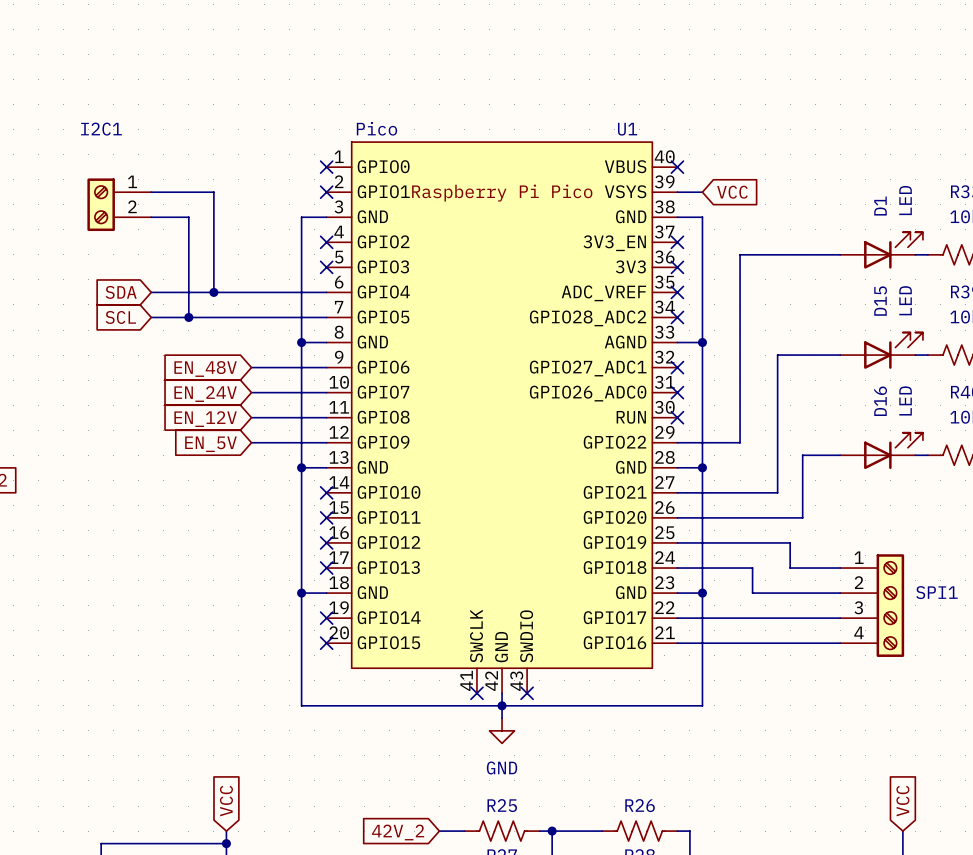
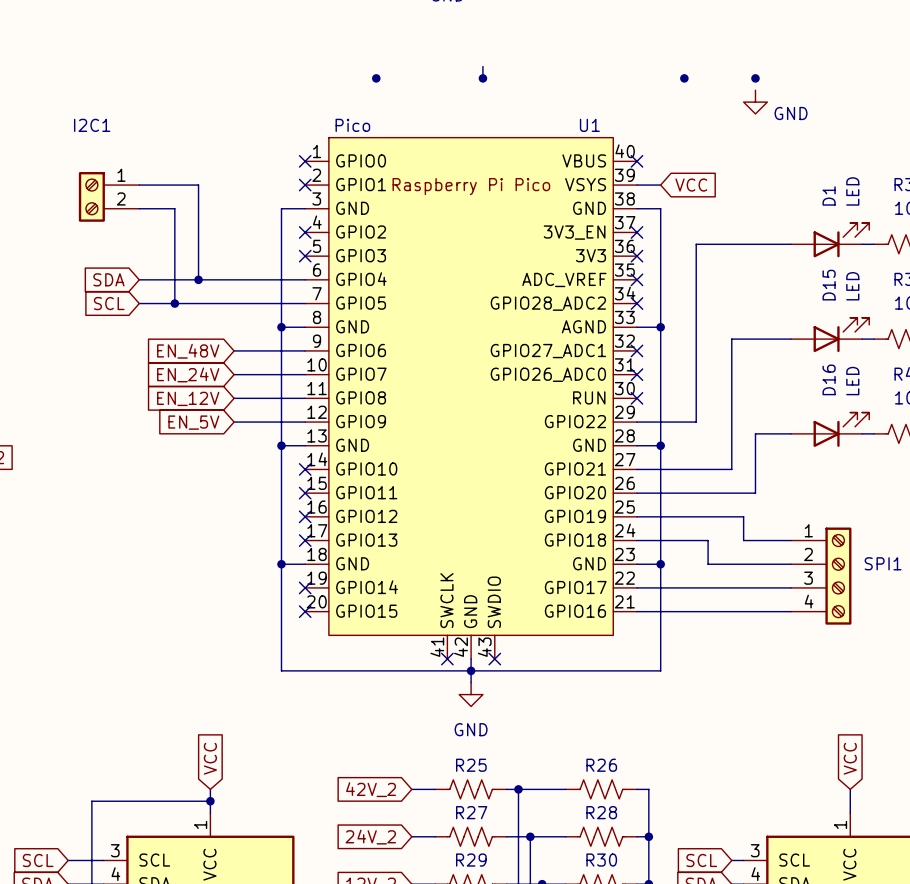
wire: none -> (482, 66) (482, 78)
junction: none -> (376, 78)
junction: none -> (482, 78)
junction: none -> (684, 78)
junction: none -> (755, 78)
power symbol: none -> GND (755, 102)

